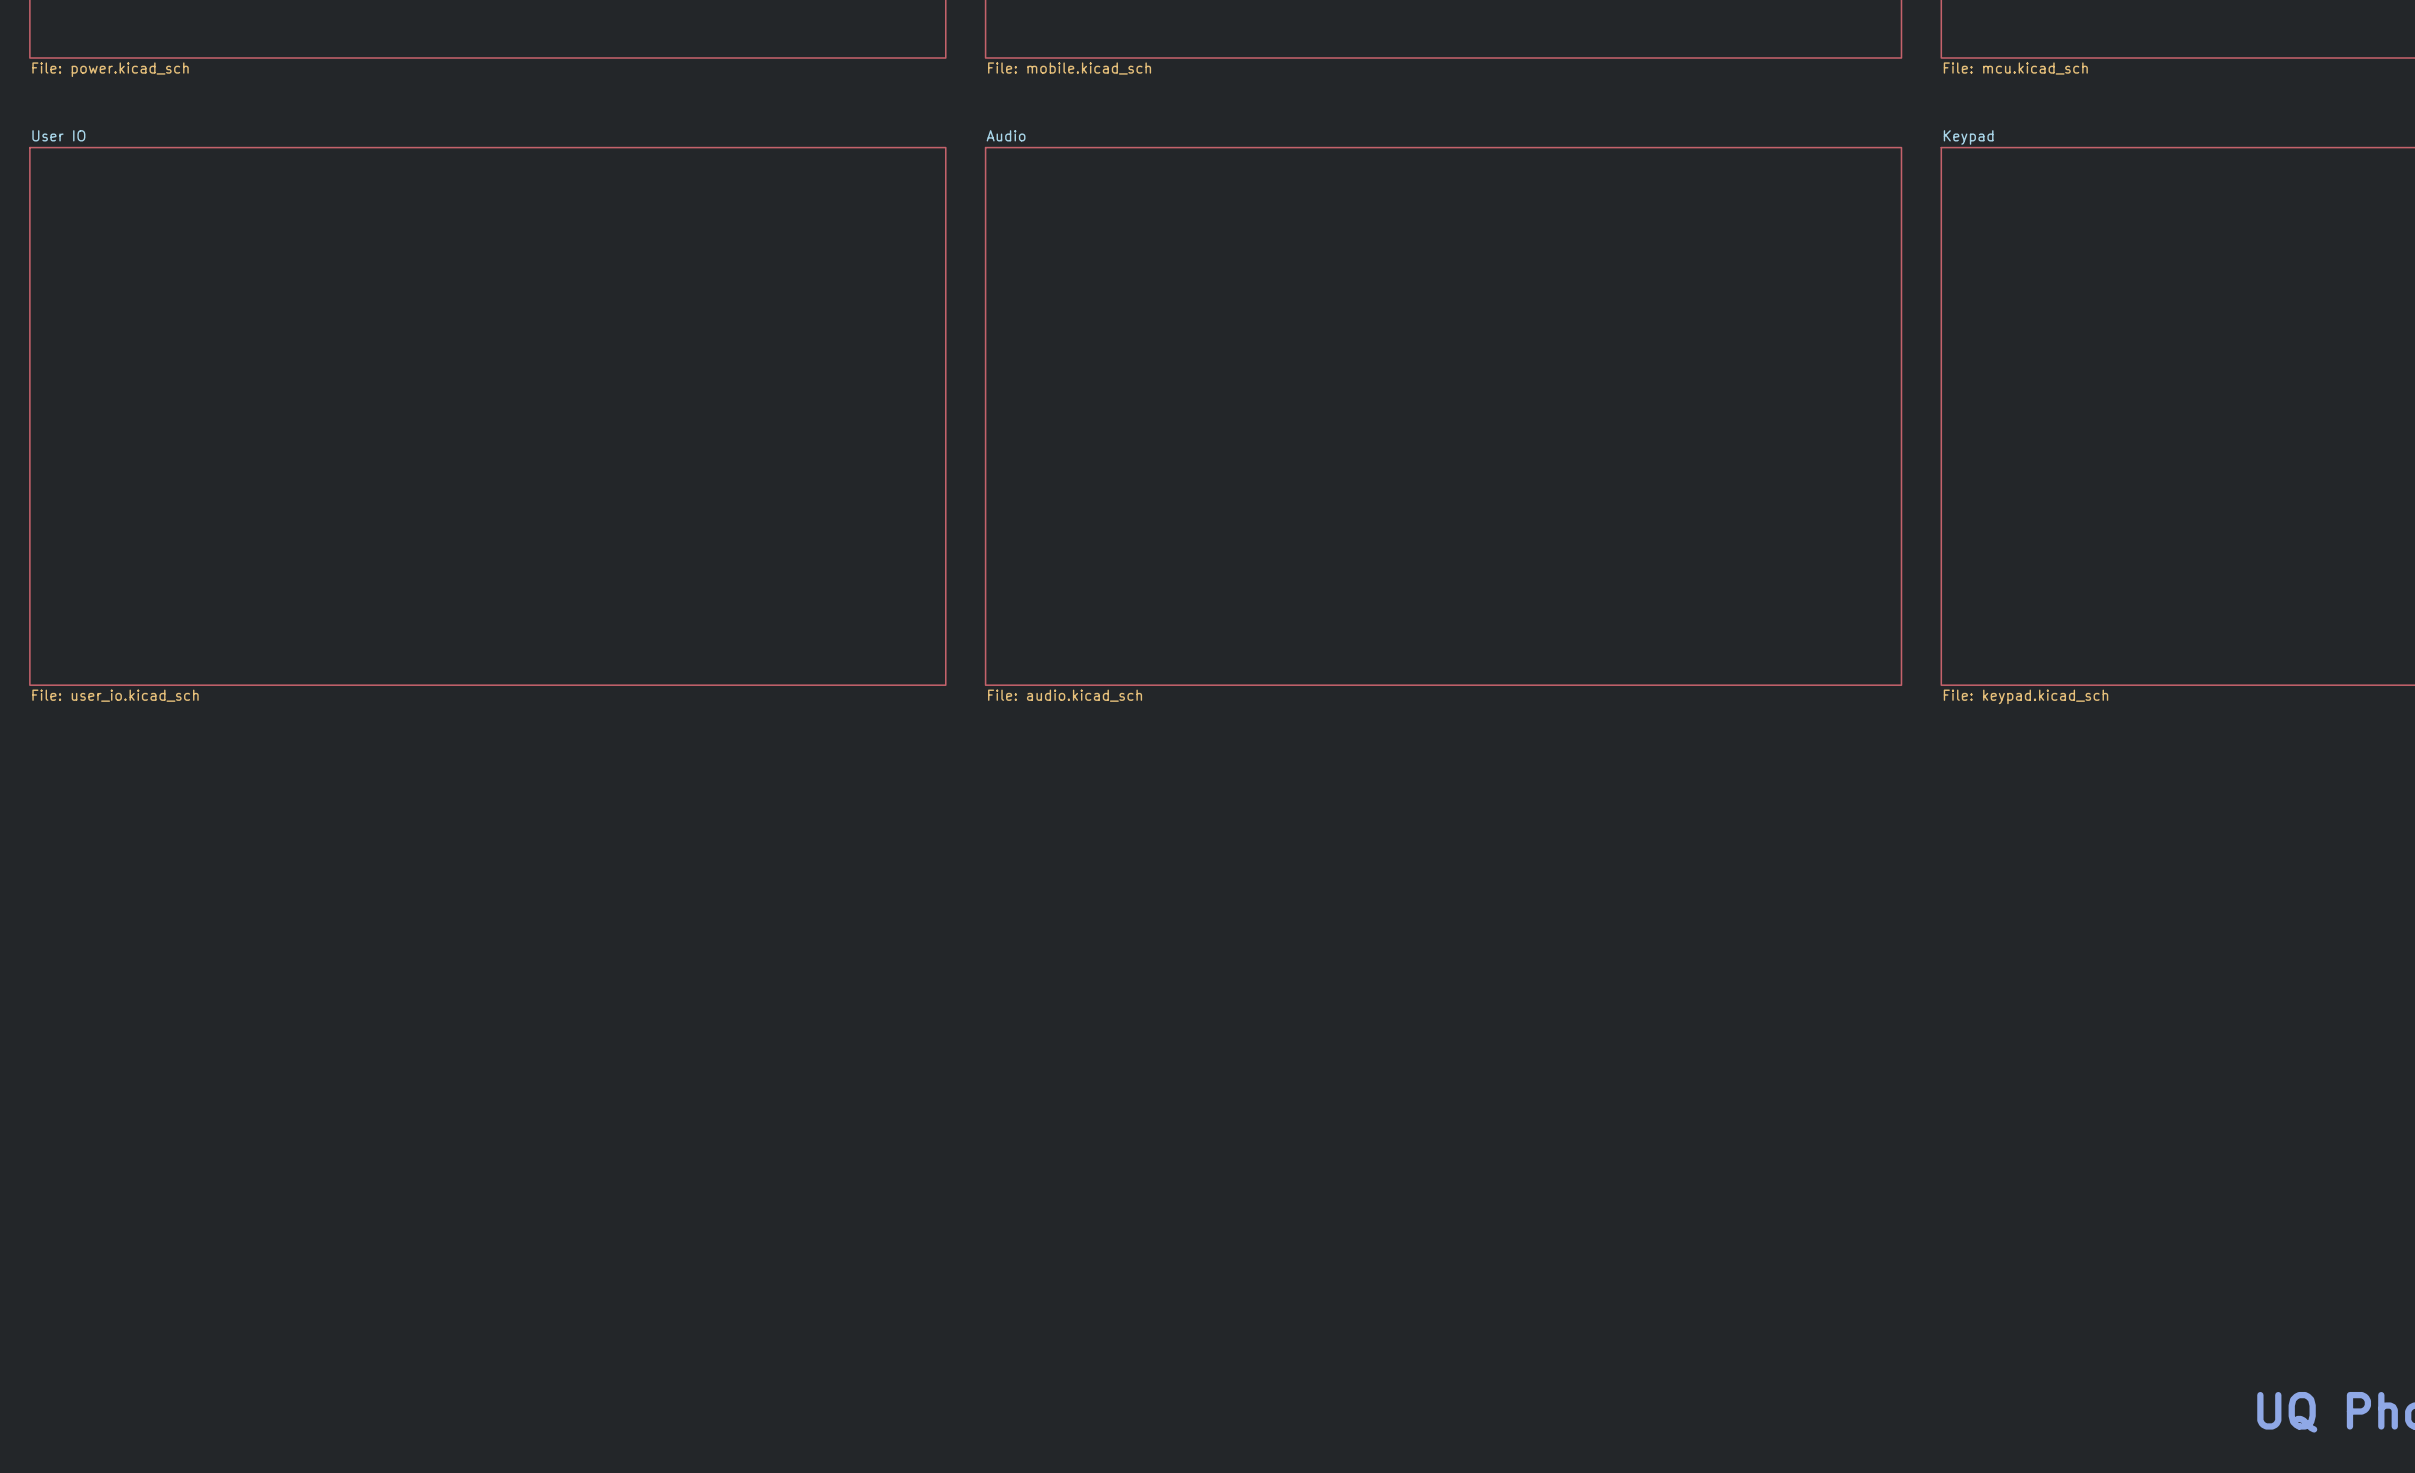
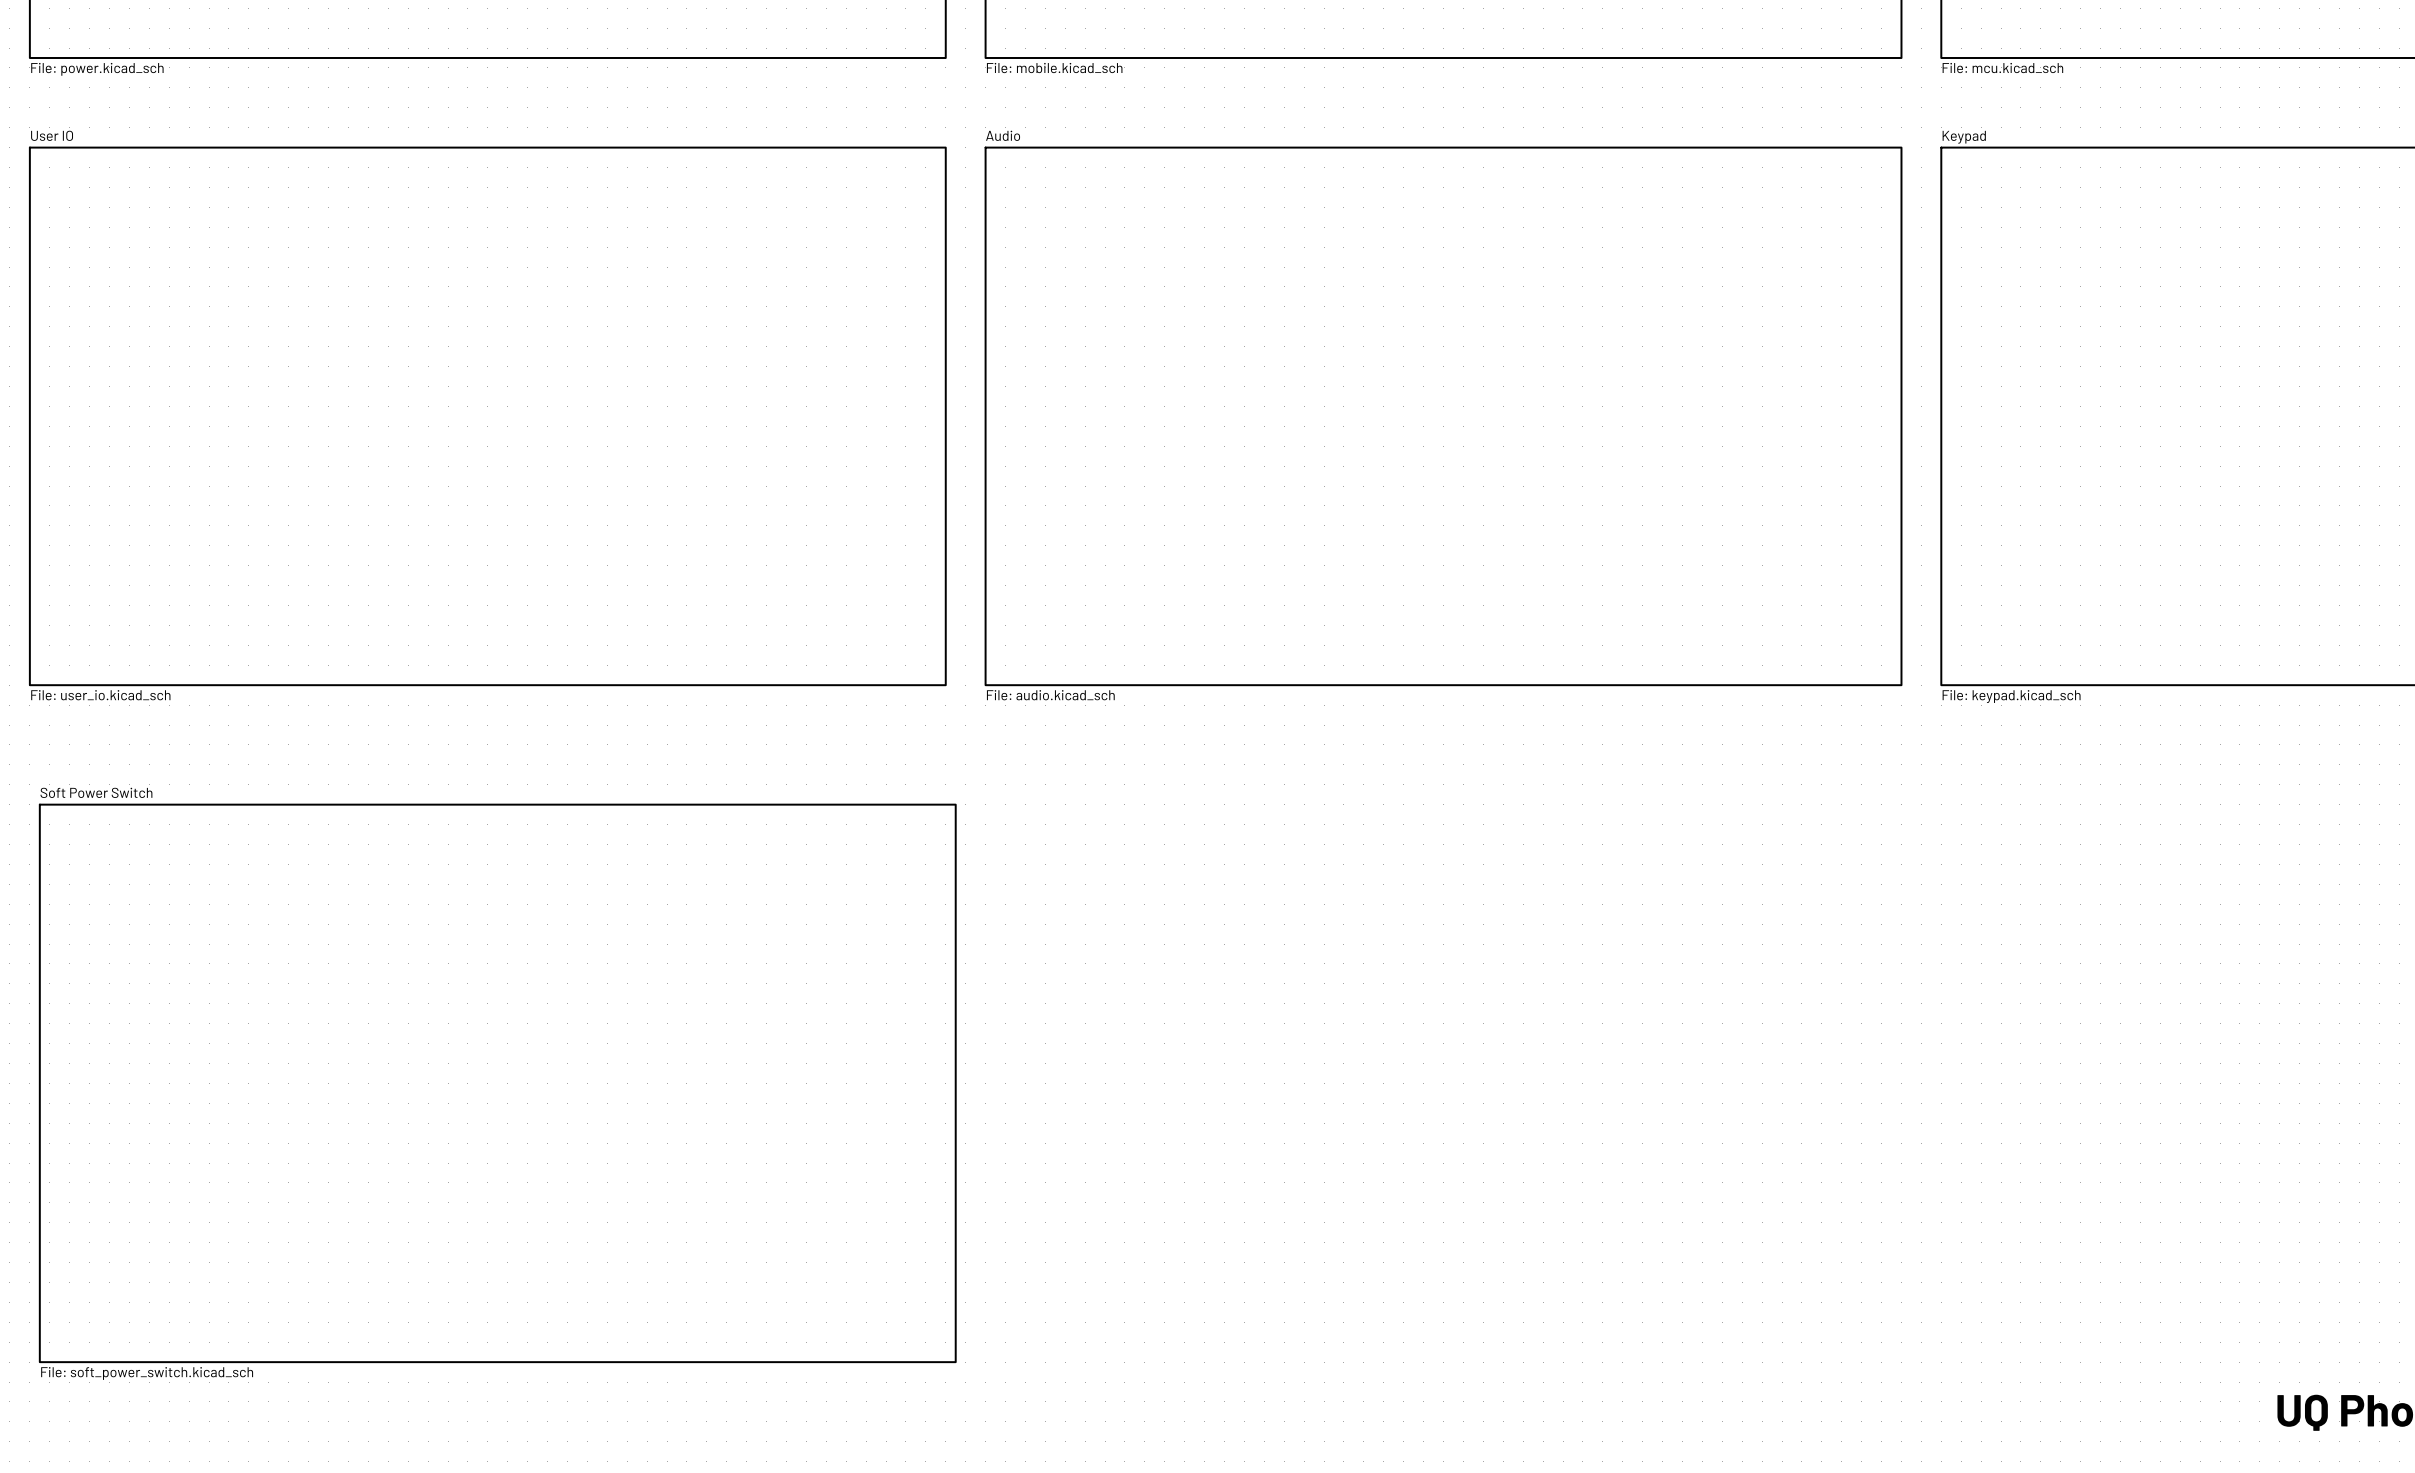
sheet Soft Power Switch: none -> File: soft_power_switch.kicad_sch (497, 1083)

